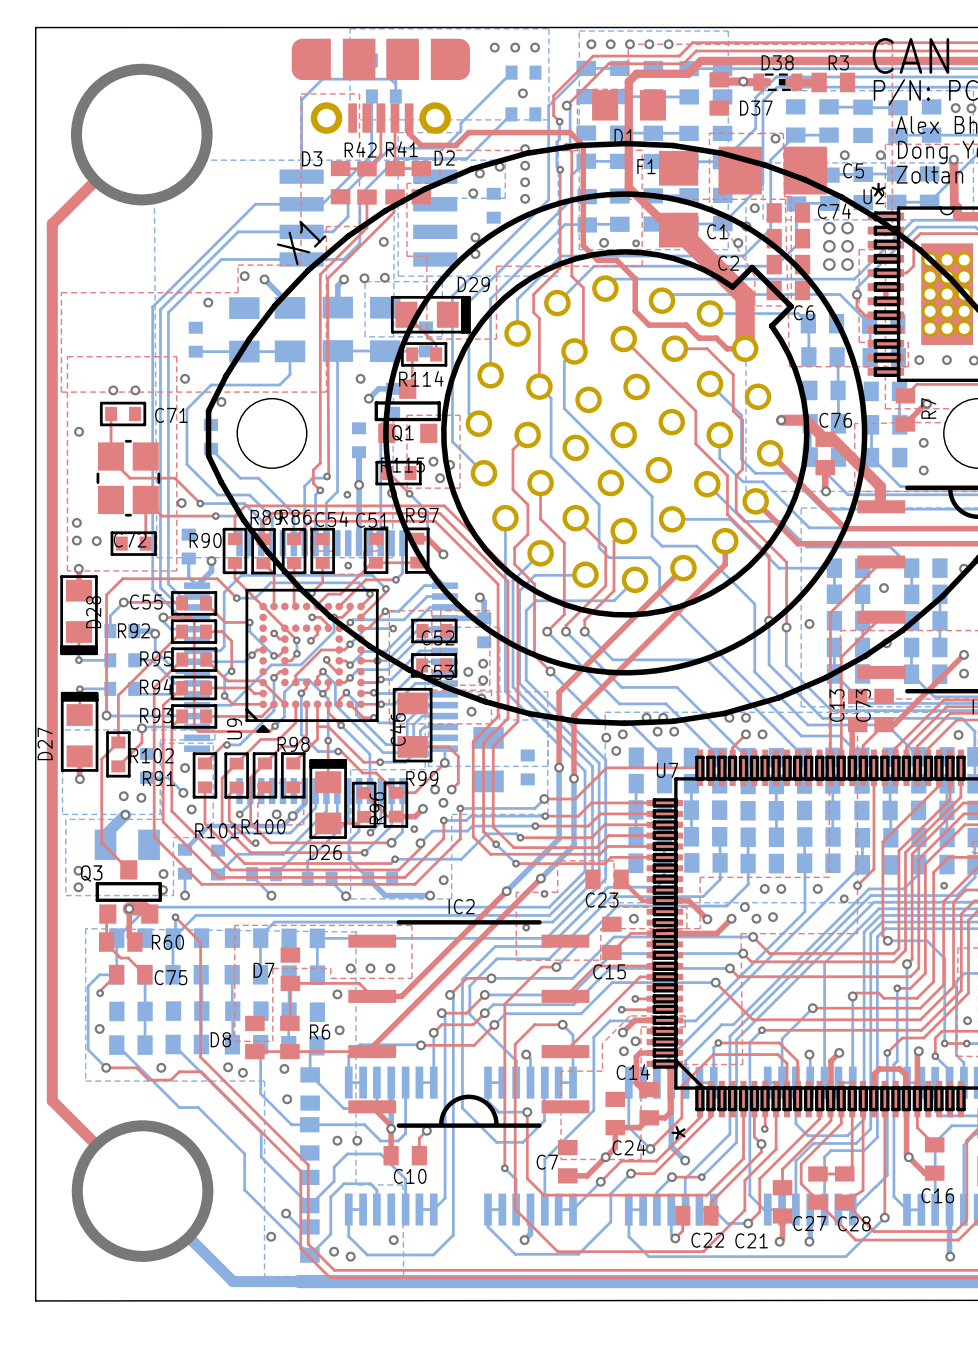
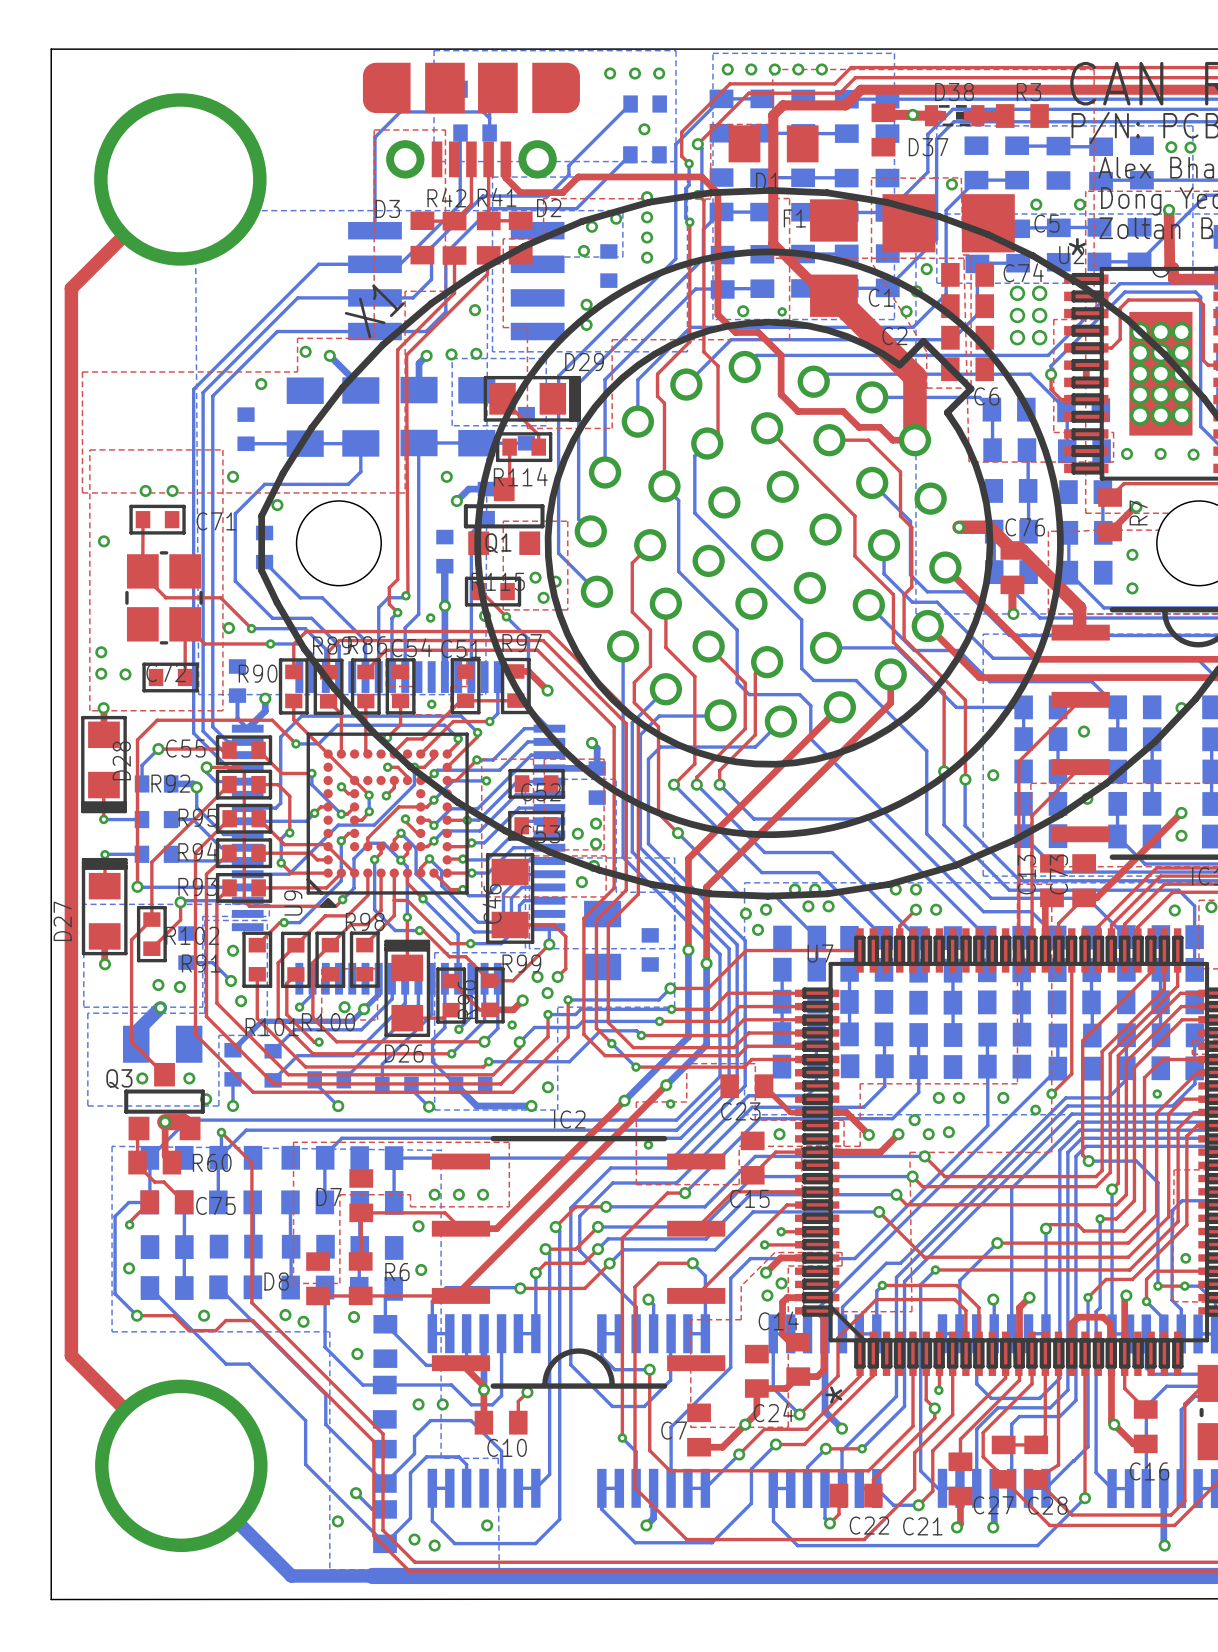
via: (78, 870) -> none
via: none -> (142, 1078)
via position: (163, 874) -> (189, 1078)
via: (78, 887) -> none

